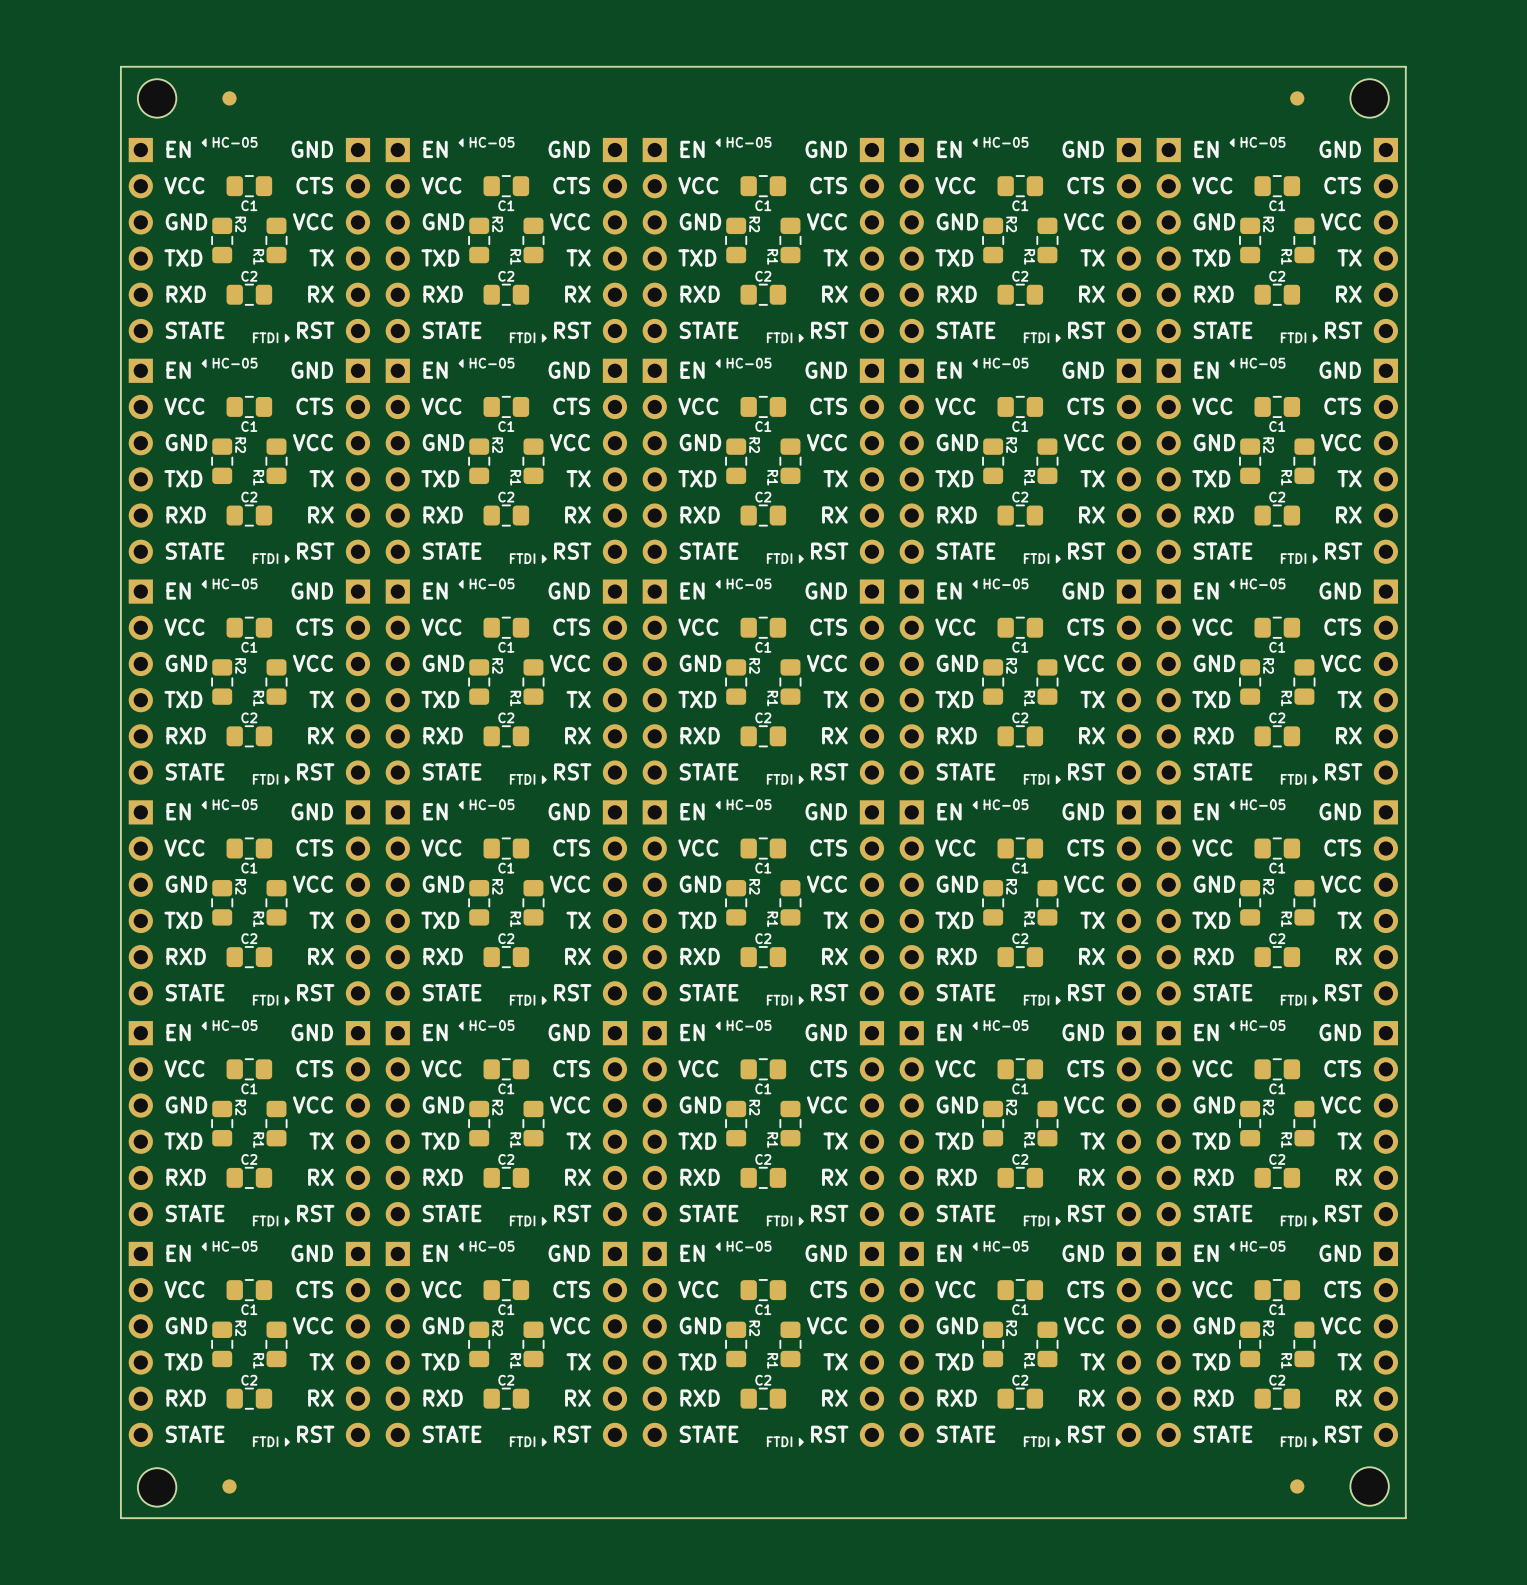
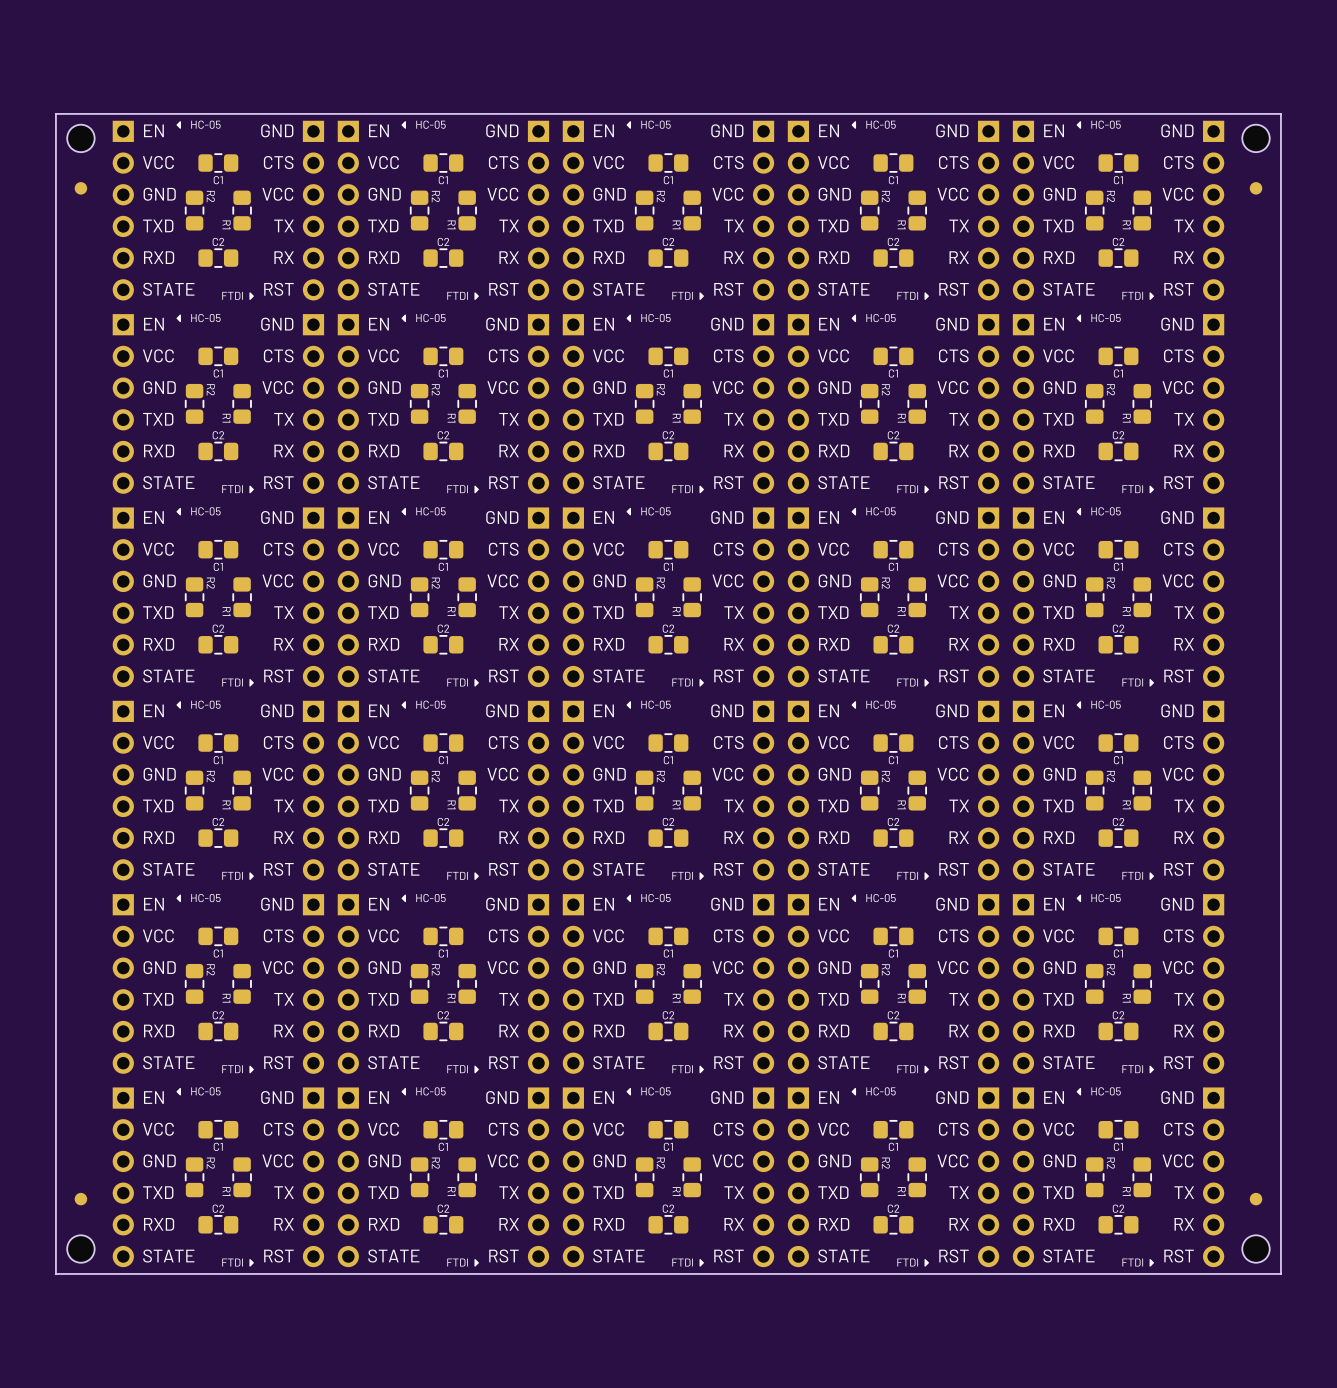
board edge: (1405, 66) (1405, 1518) (120, 1518) (120, 66) (1405, 66) -> (1280, 113) (1280, 1273) (55, 1273) (55, 113) (1280, 113)
part: (157, 98) -> none
part position: (229, 98) -> (80, 188)
part position: (1297, 98) -> (1256, 188)
part: (1369, 98) -> none
part: none -> (80, 138)
part: none -> (1256, 138)
part: none -> (80, 1249)
part: none -> (1256, 1249)
part position: (229, 1486) -> (80, 1199)
part position: (1297, 1486) -> (1256, 1199)
part: (1369, 1486) -> none
part: (157, 1487) -> none

